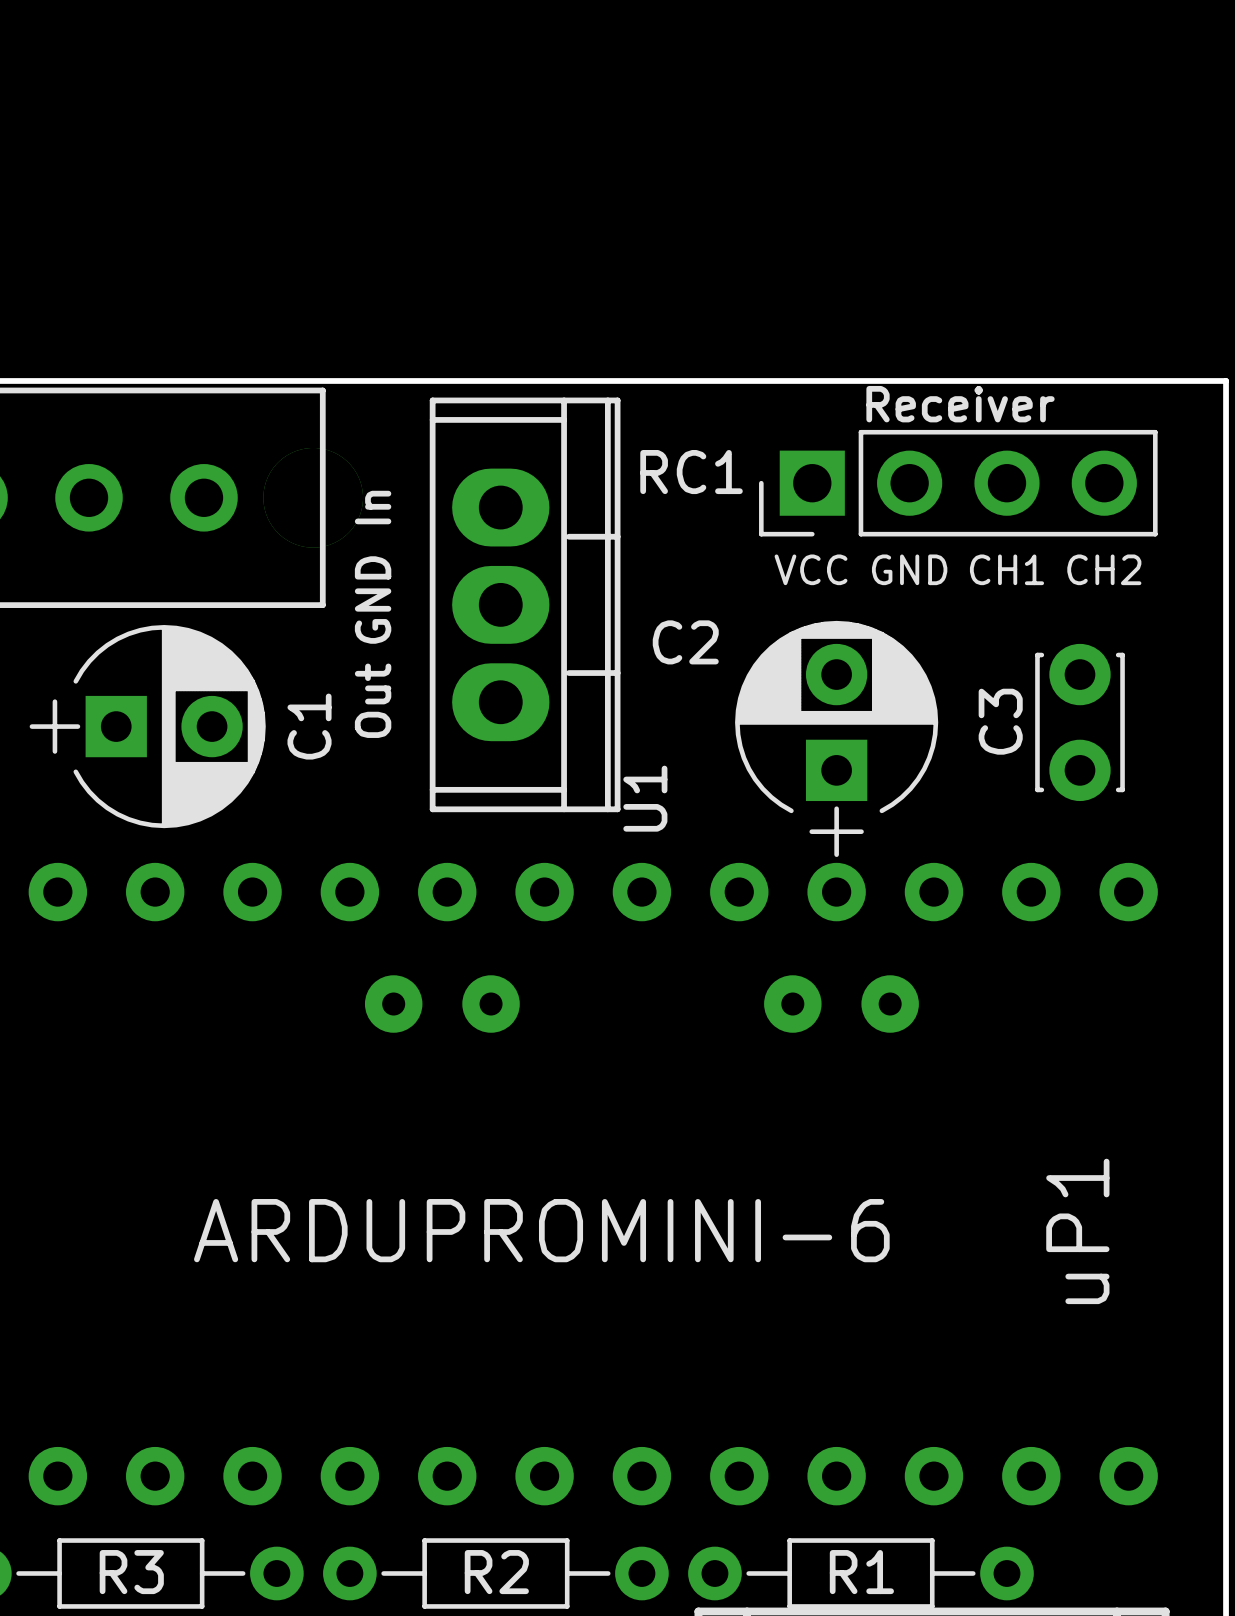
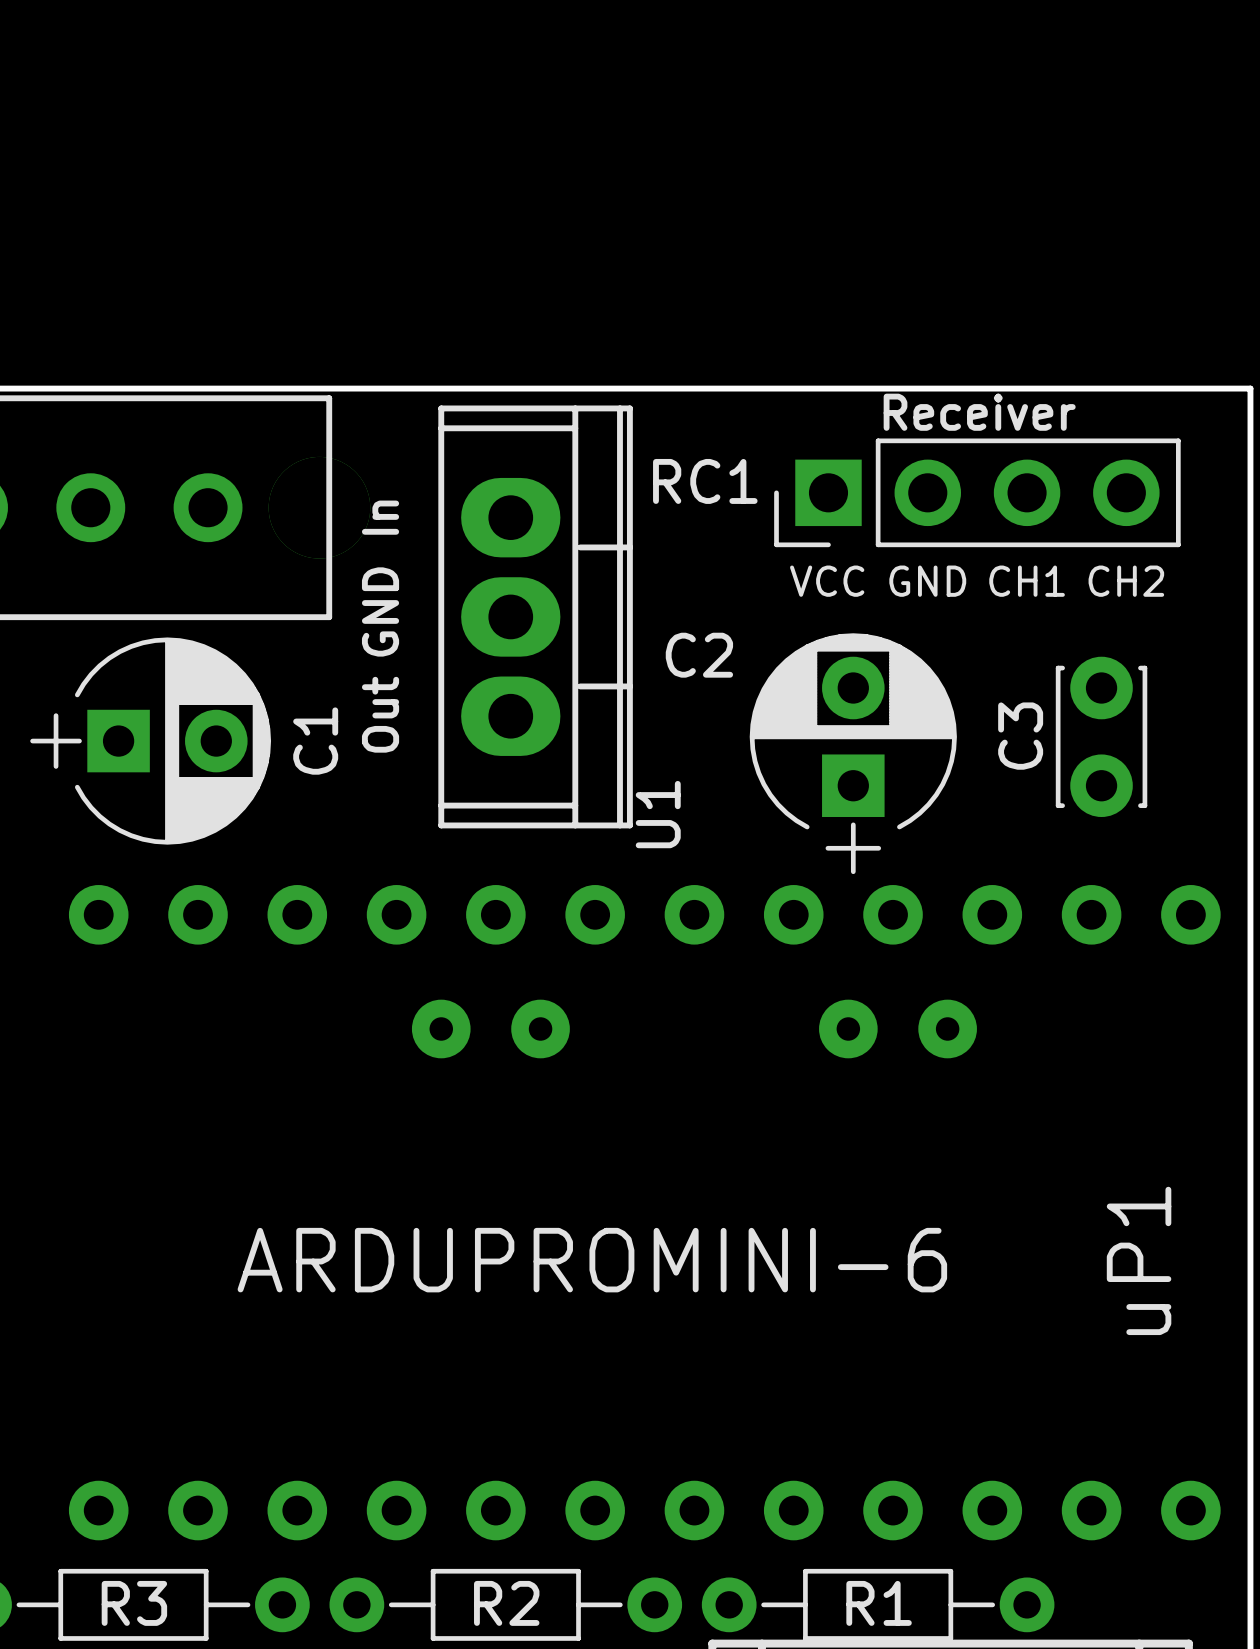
uP1 position: (593, 1184) -> (644, 1212)

